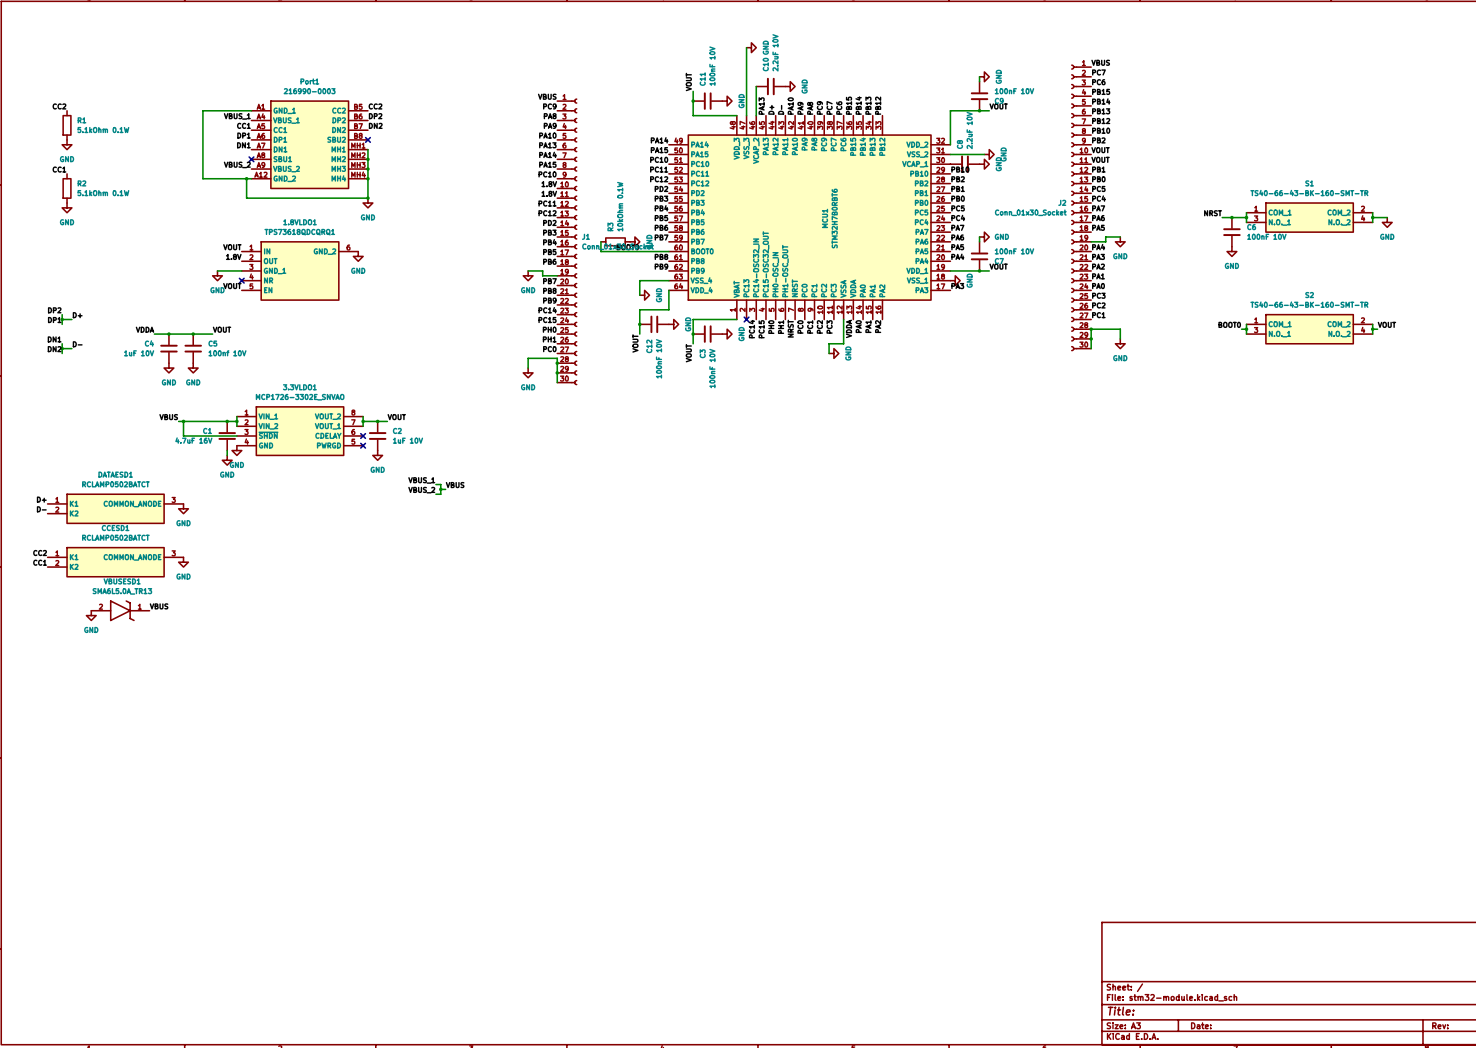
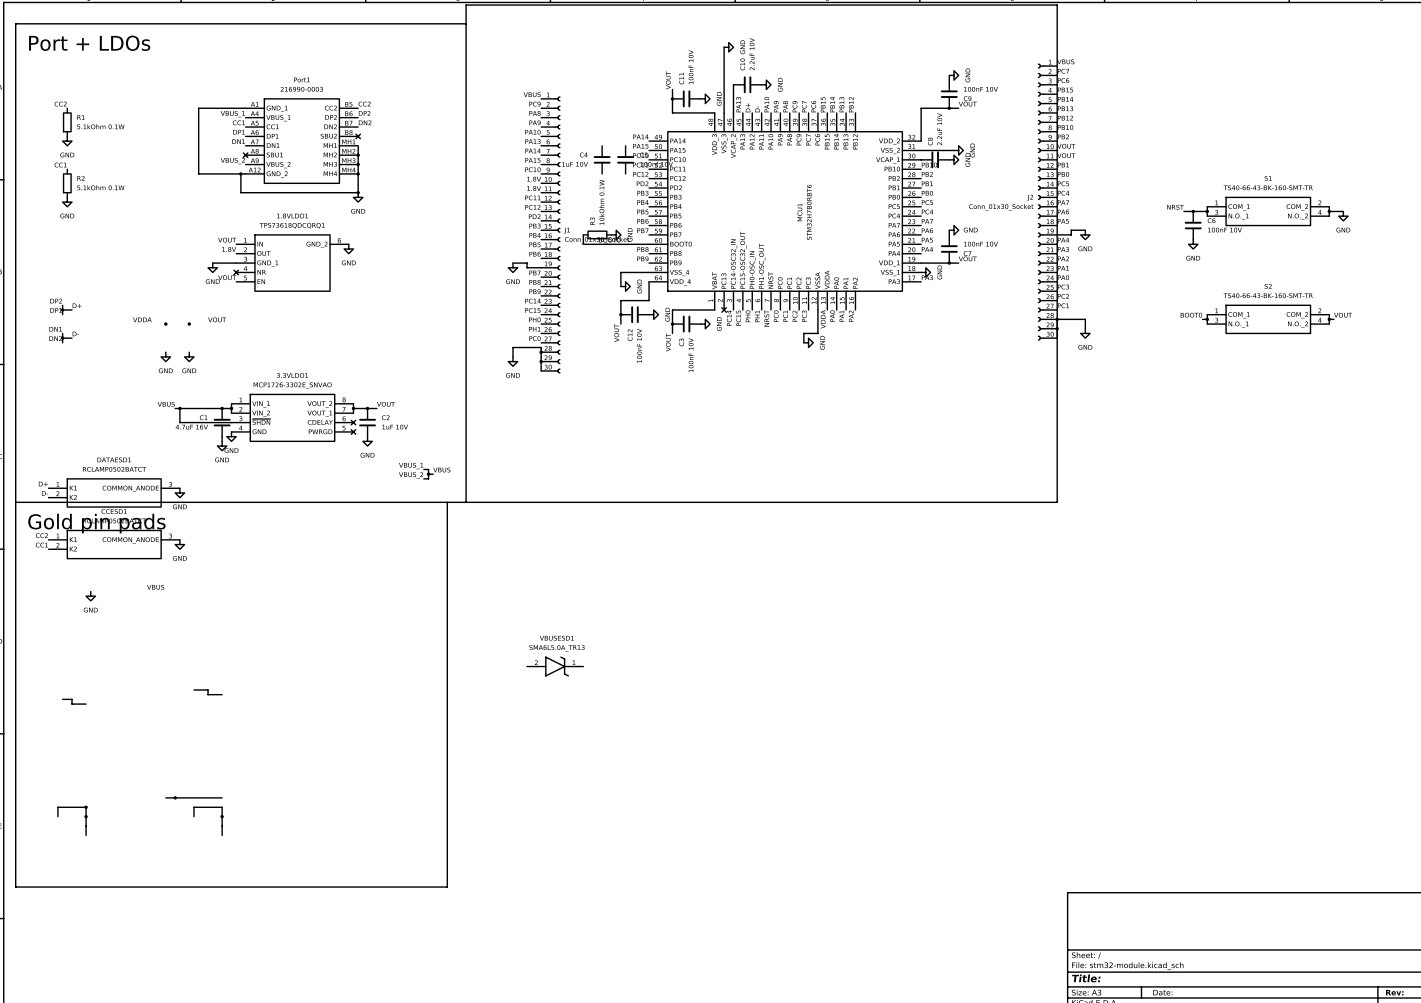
line: none -> (466, 23) (15, 23) (15, 887) (447, 887) (447, 502)
text: none -> Port + LDOs (89, 43)
wire: (154, 334) (212, 334) -> none
part position: (168, 348) -> (602, 159)
part position: (193, 348) -> (625, 159)
line: none -> (15, 502) (1057, 502) (1057, 5) (466, 5) (466, 502)
text: none -> Gold pin pads (96, 523)
part position: (120, 610) -> (555, 666)
wire: none -> (193, 689) (208, 689) (208, 694) (222, 694)
wire: none -> (62, 699) (72, 699) (72, 704) (86, 704)
wire: none -> (165, 797) (222, 797)
junction: none -> (175, 797)
junction: none -> (86, 807)
wire: none -> (57, 816) (57, 807) (86, 807) (86, 835)
junction: none -> (86, 816)
wire: none -> (193, 816) (193, 807) (222, 807) (222, 835)
junction: none -> (222, 816)

